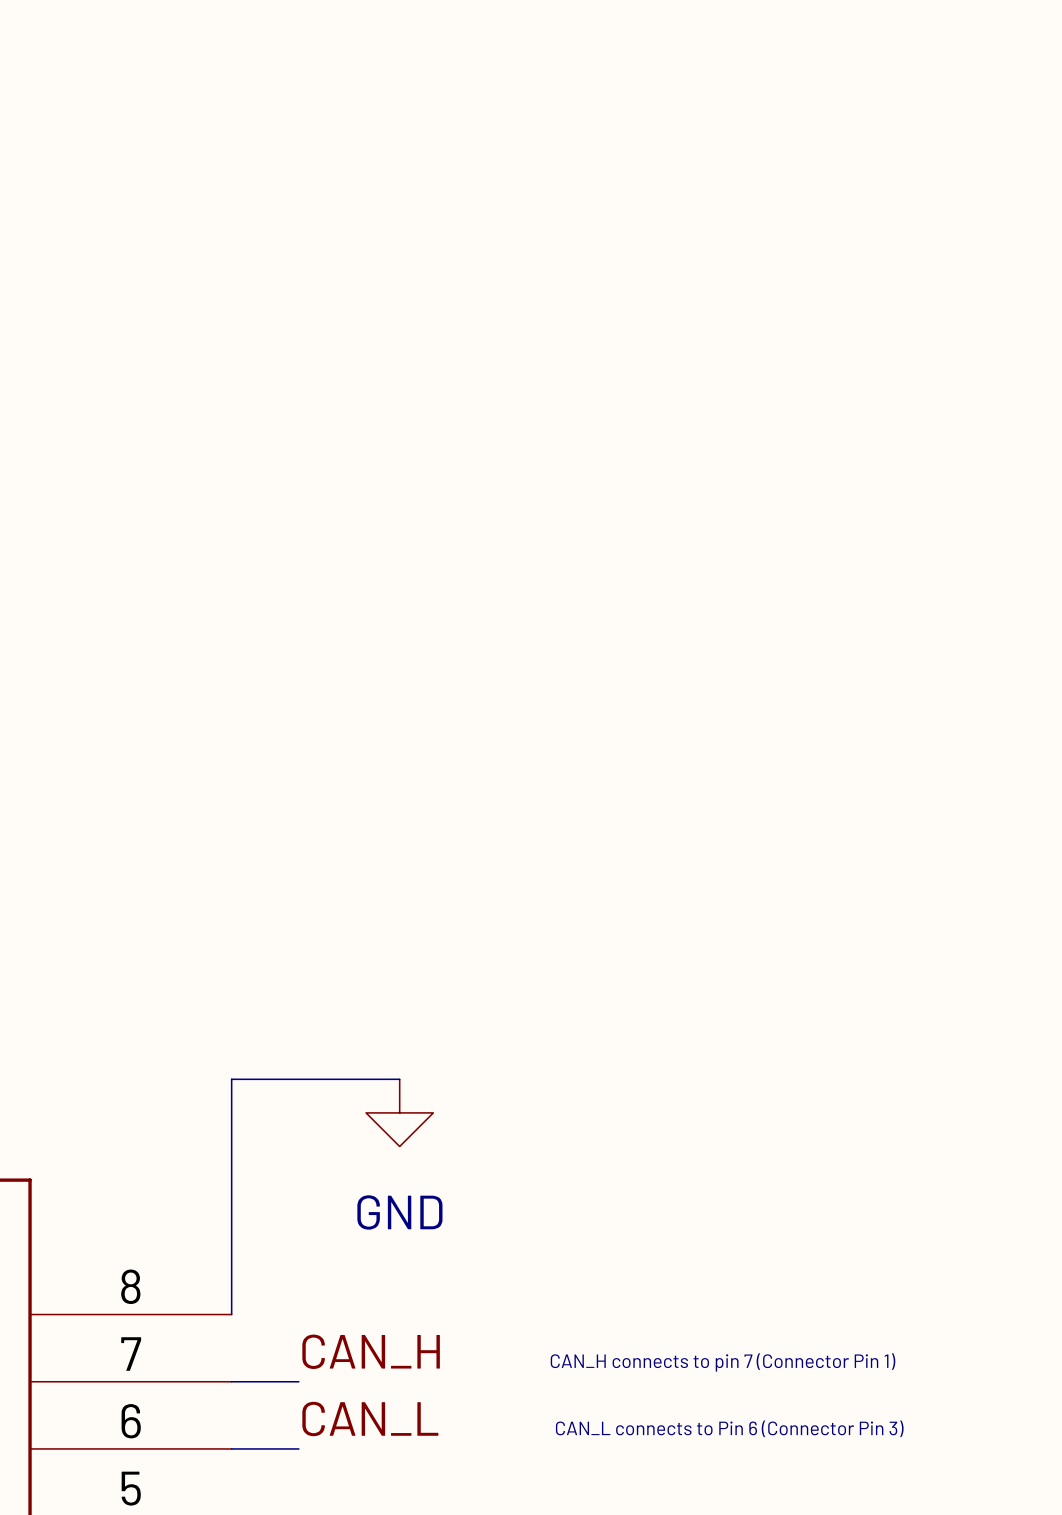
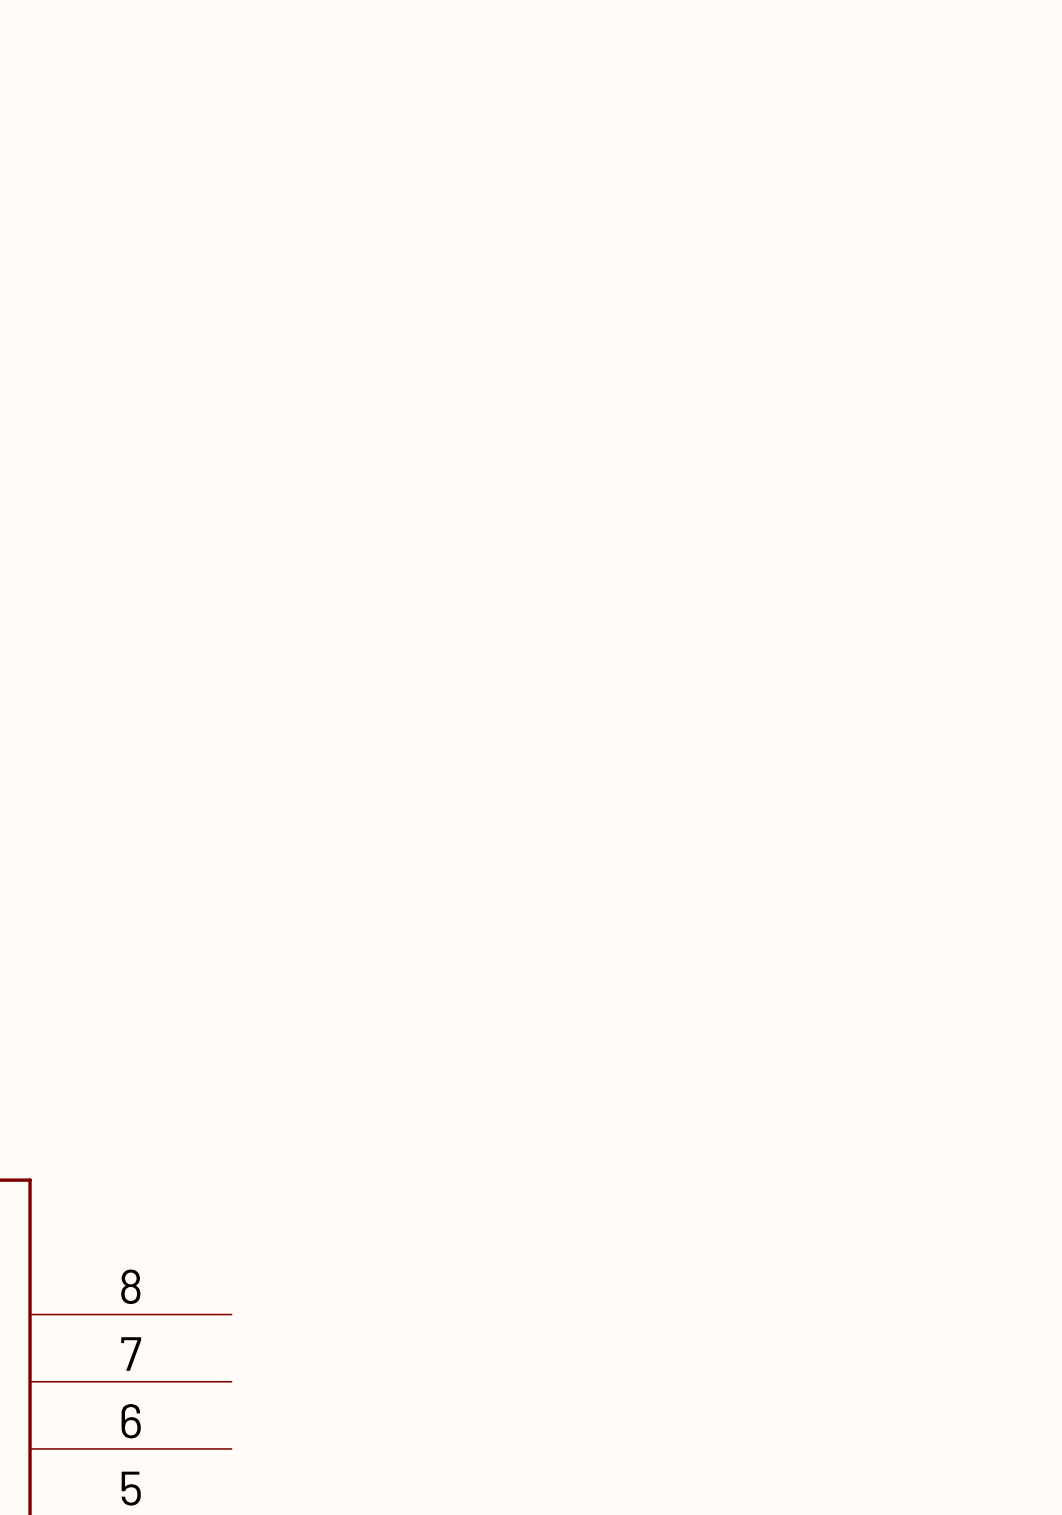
wire: (399, 1079) (231, 1079) (231, 1314) -> none
power symbol: GND (399, 1112) -> none
label: CAN_H (371, 1351) -> none
text: CAN_H connects to pin 7 (Connector Pin 1) (723, 1362) -> none
wire: (231, 1381) (298, 1381) -> none
label: CAN_L (370, 1419) -> none
text: CAN_L connects to Pin 6 (Connector Pin 3) (729, 1428) -> none
wire: (231, 1448) (298, 1448) -> none

